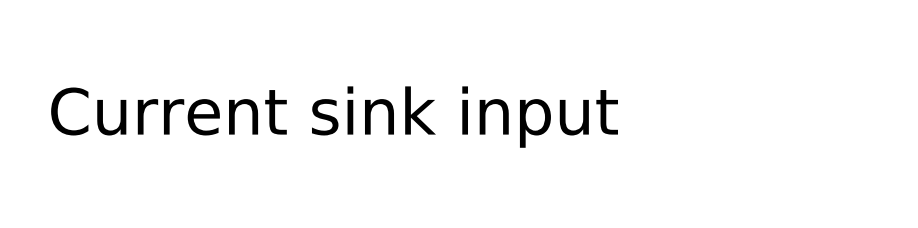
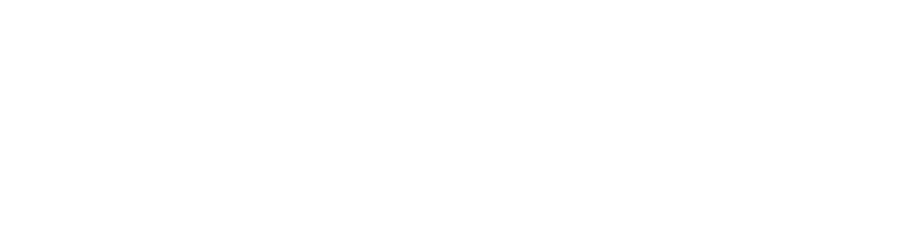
text: Current sink input (334, 117) -> none

